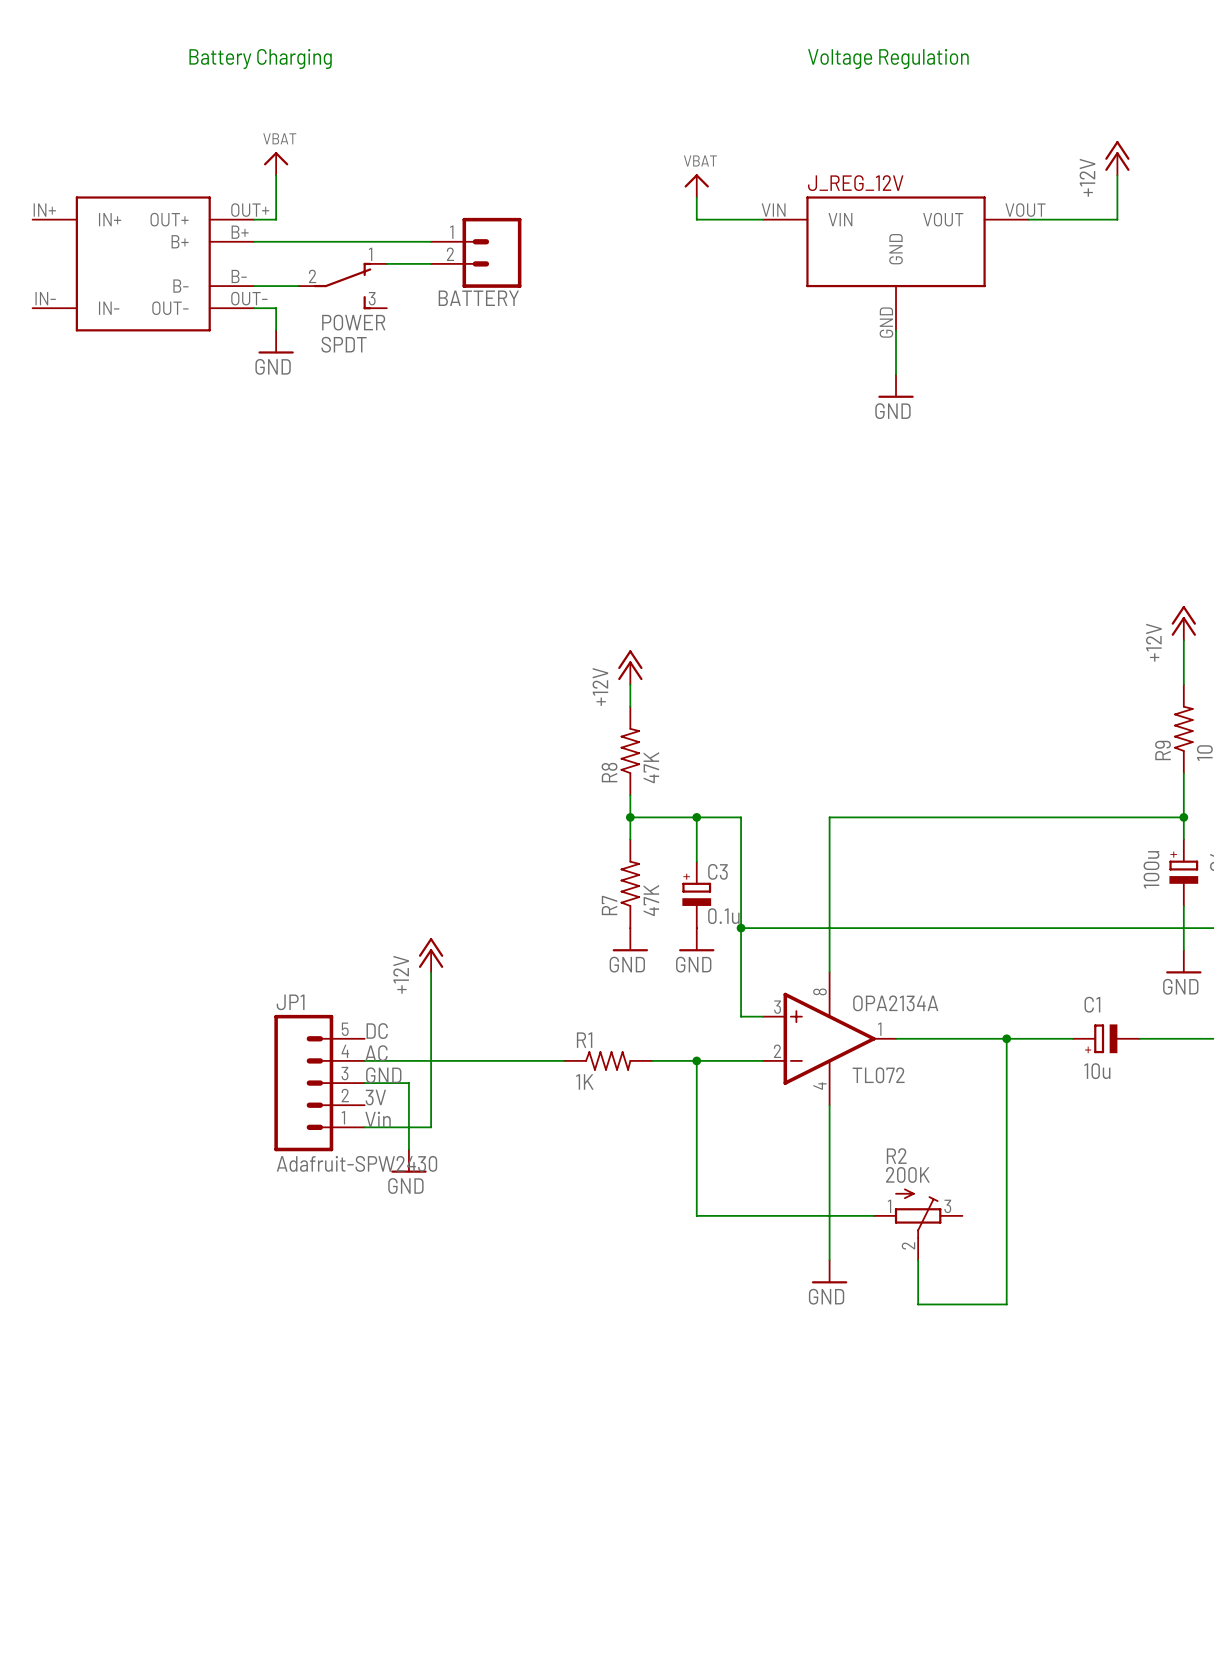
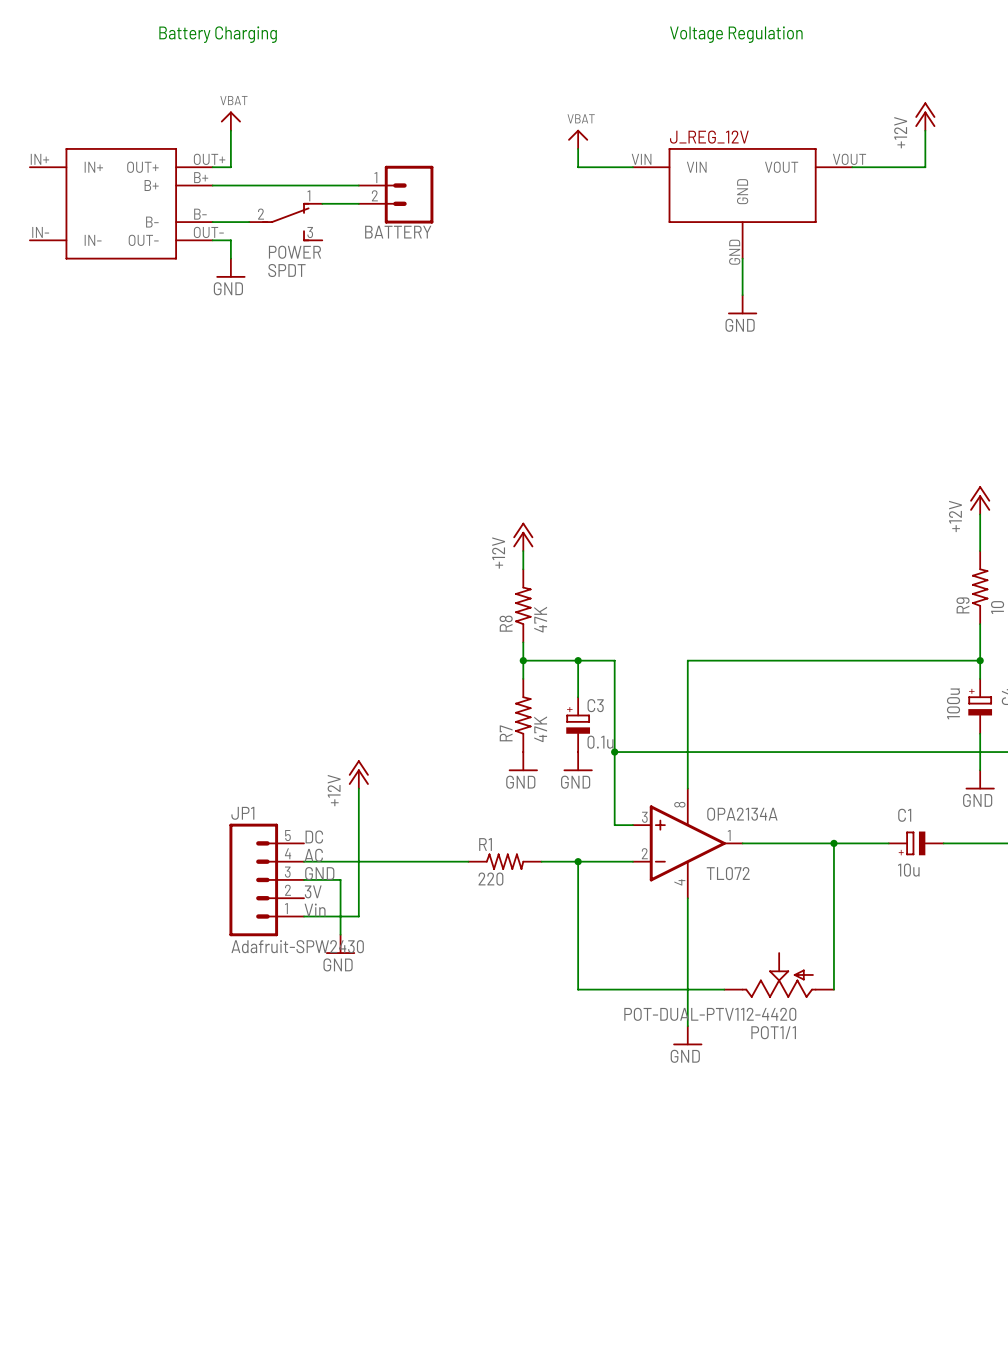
R1 value: 1K (584, 1081) -> 220 (490, 879)
POT1/1: none -> POT-DUAL-PTV112-4420 (779, 975)
wire: (1006, 1215) (1006, 1304) (918, 1304) (918, 1260) -> none
R2: 200K (918, 1224) -> none

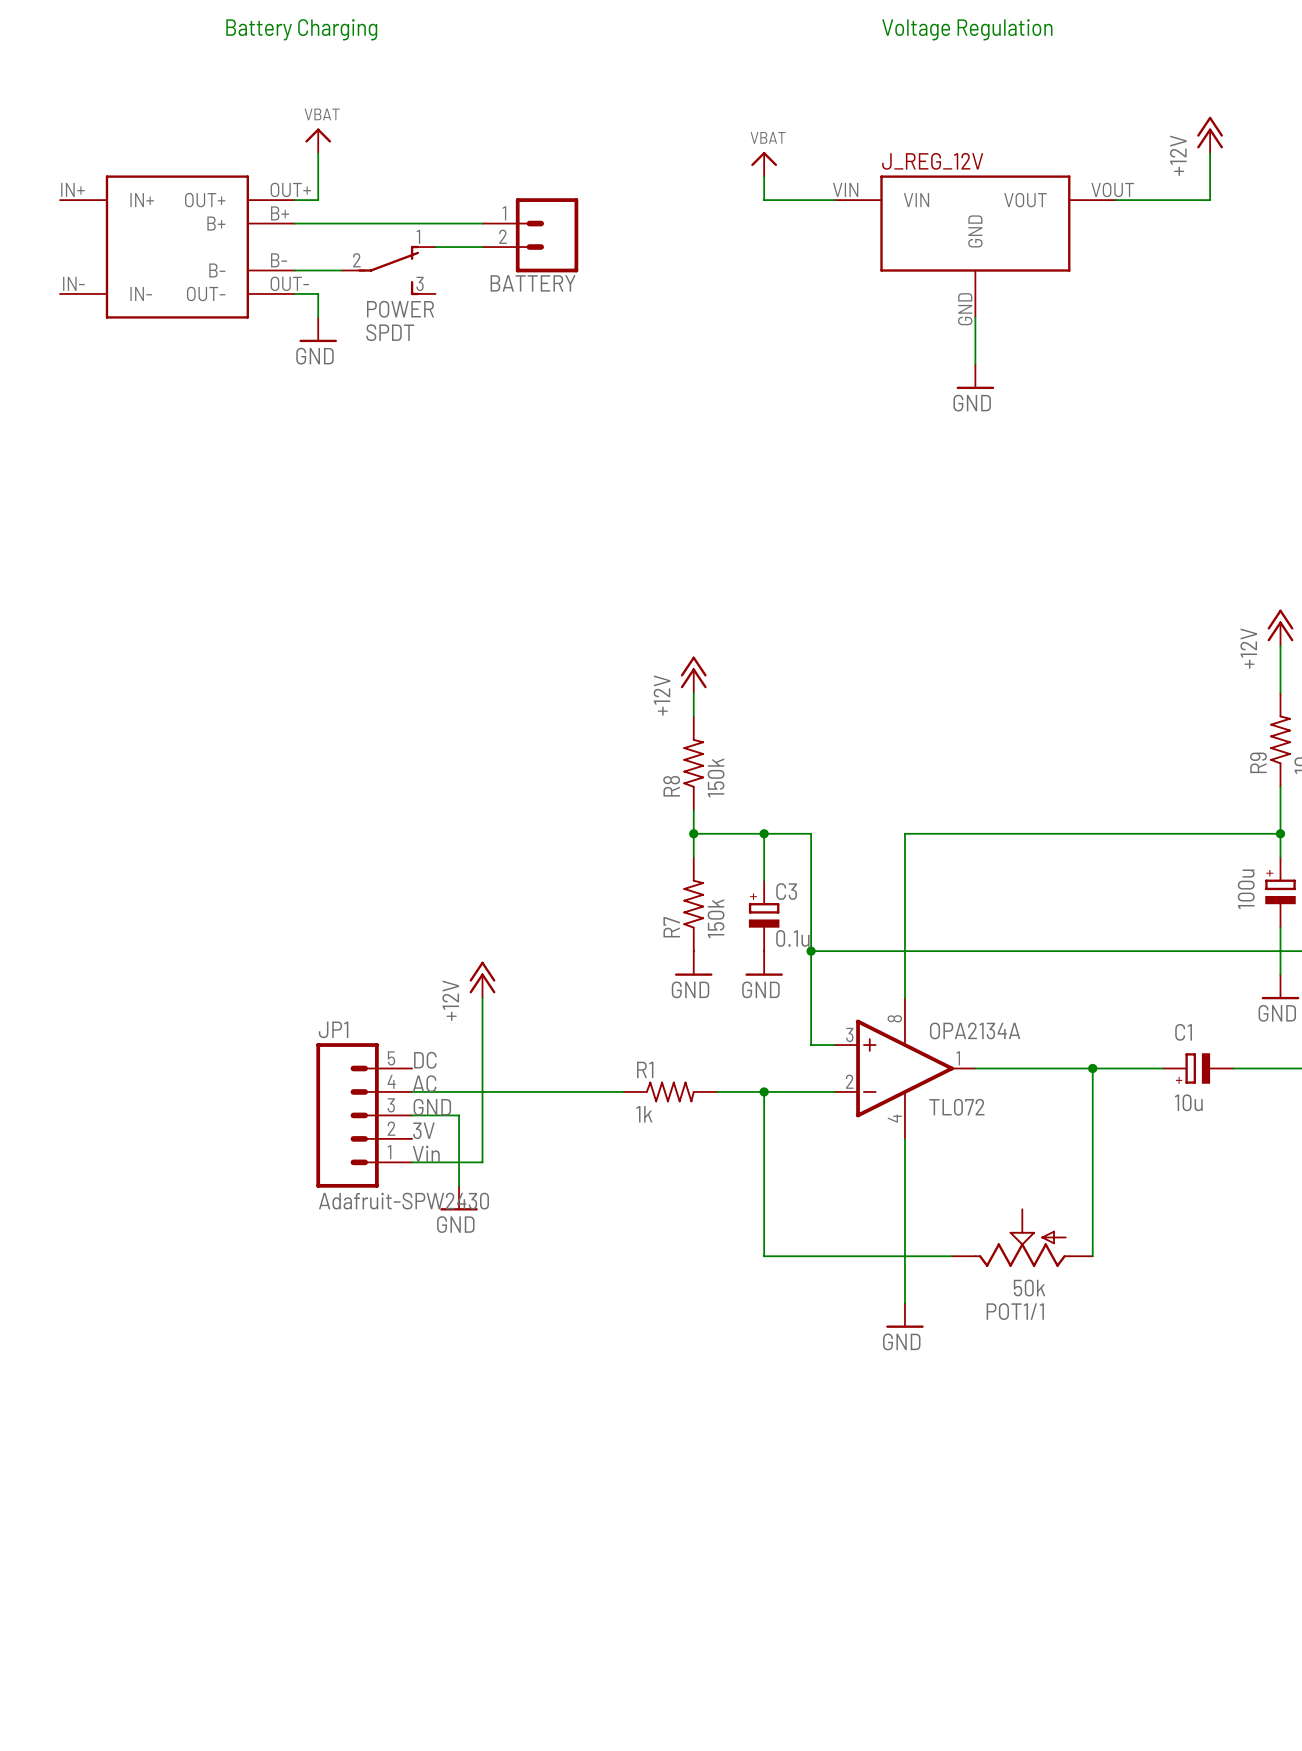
R8 value: 47K (540, 619) -> 150k (716, 777)
R7 value: 47K (540, 729) -> 150k (716, 918)
R1 value: 220 (490, 879) -> 1k (644, 1114)
POT1/1 value: POT-DUAL-PTV112-4420 (710, 1014) -> 50k (1029, 1288)

